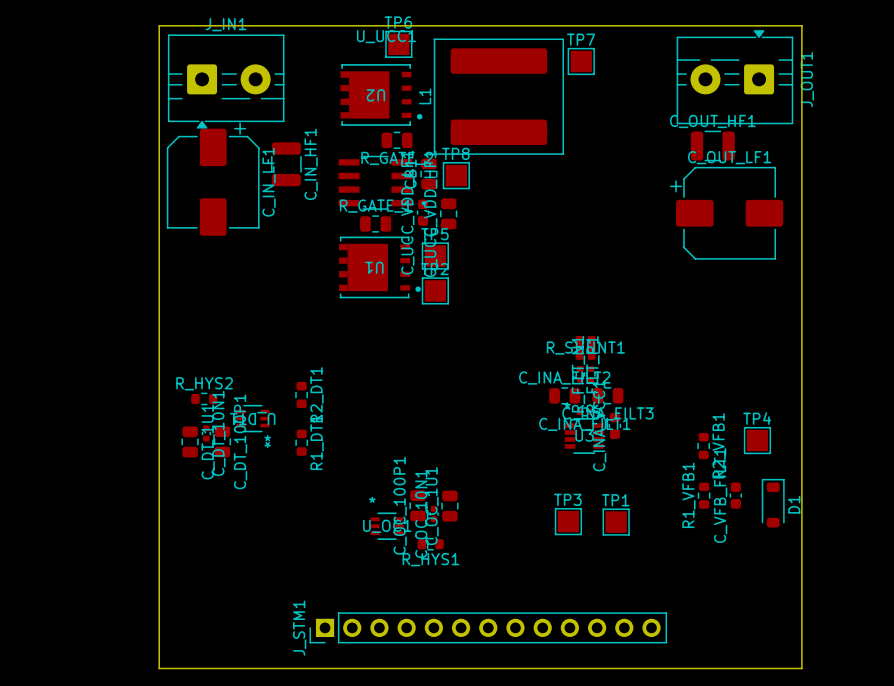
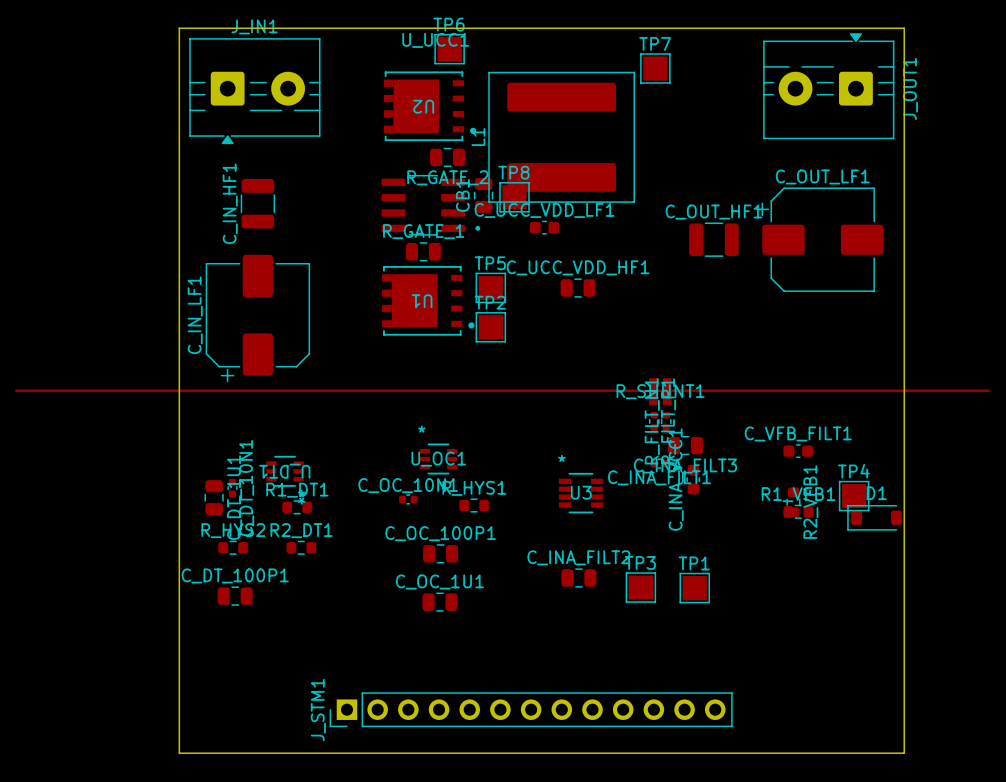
L1 position: (498, 96) -> (561, 137)
C_IN_LF1 footprint: [166, 122, 260, 236] -> [205, 254, 311, 383]
C_OUT_HF1 position: (712, 145) -> (713, 239)
C_IN_HF1 position: (286, 164) -> (257, 203)
C_IN_HF1 name position: C_IN_HF1 (311, 164) -> C_IN_HF1 (230, 203)
C_IN_LF1 name position: C_IN_LF1 (269, 182) -> C_IN_LF1 (195, 315)
C_UCC_VDD_LF1 rotation: 0° (423, 212) -> 90° clockwise (544, 227)
C_UCC_VDD_LF1 position: (423, 212) -> (544, 227)
C_UCC_VDD_HF1 rotation: 0° (448, 213) -> 90° clockwise (578, 288)
C_UCC_VDD_HF1 position: (448, 213) -> (578, 288)
top track: none -> (16, 390) (988, 390)
R2_DT1 rotation: 0° (301, 394) -> 90° clockwise (301, 547)
R2_DT1 position: (301, 394) -> (301, 547)
R2_DT1 name position: R2_DT1 (317, 394) -> R2_DT1 (301, 530)
C_INA_FILT2 position: (564, 395) -> (578, 577)
R_HYS2 position: (204, 398) -> (233, 547)
U3 position: (584, 436) -> (581, 493)
C_DT_100P1 rotation: 0° (222, 441) -> 90° clockwise (235, 596)
C_DT_100P1 position: (222, 441) -> (235, 596)
C_DT_100P1 name position: C_DT_100P1 (240, 441) -> C_DT_100P1 (235, 575)
R1_DT1 rotation: 0° (301, 442) -> 90° clockwise (297, 507)
R1_DT1 position: (301, 442) -> (297, 507)
R1_DT1 name position: R1_DT1 (317, 442) -> R1_DT1 (297, 490)
R1_VFB1 rotation: 0° (704, 495) -> 90° clockwise (798, 511)
R1_VFB1 position: (704, 495) -> (798, 511)
C_VFB_FILT1 rotation: 0° (735, 495) -> 90° clockwise (798, 451)
C_VFB_FILT1 position: (735, 495) -> (798, 451)
D1 rotation: 0° (773, 503) -> 90° counterclockwise (874, 517)
D1 position: (773, 503) -> (874, 517)
C_OC_100P1 rotation: 0° (418, 505) -> 90° clockwise (440, 553)
C_OC_100P1 position: (418, 505) -> (440, 553)
C_OC_1U1 rotation: 0° (449, 506) -> 90° clockwise (439, 602)
C_OC_1U1 position: (449, 506) -> (439, 602)
C_OC_10N1 rotation: 0° (434, 514) -> 90° clockwise (408, 499)
C_OC_10N1 position: (434, 514) -> (408, 499)
U_OC1 position: (387, 526) -> (438, 458)
R_HYS1 position: (430, 544) -> (474, 505)
R_HYS1 name position: R_HYS1 (430, 559) -> R_HYS1 (474, 488)
J_STM1 position: (488, 627) -> (531, 709)

